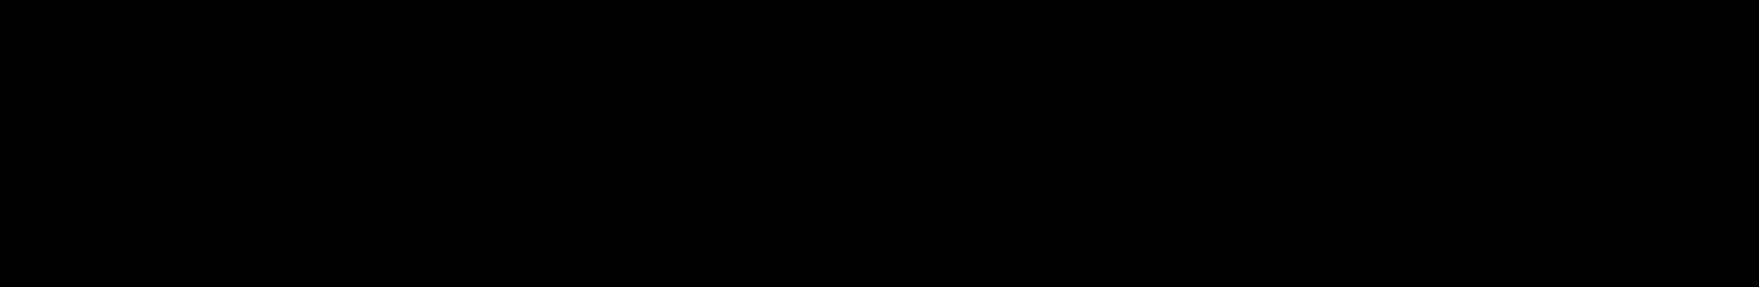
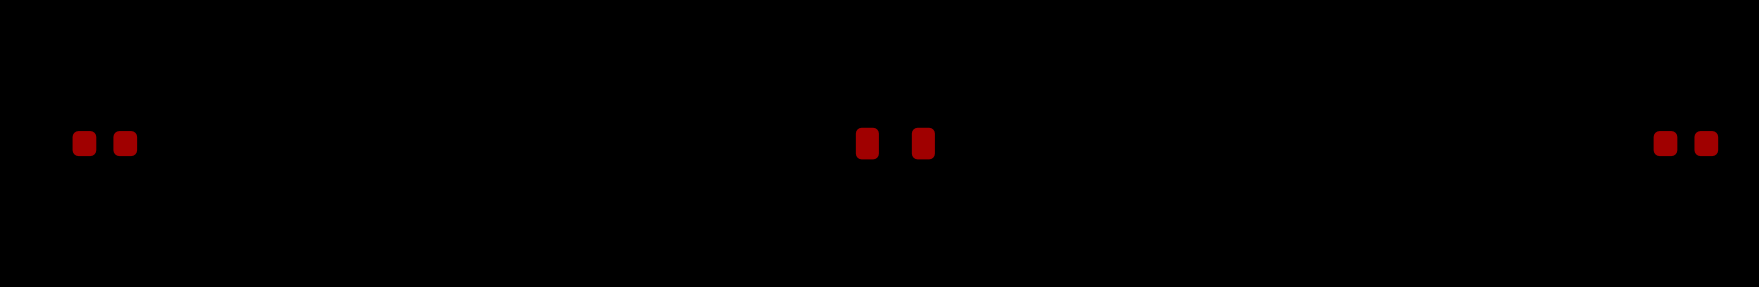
part: none -> (104, 143)
part: none -> (895, 143)
part: none -> (1685, 143)

